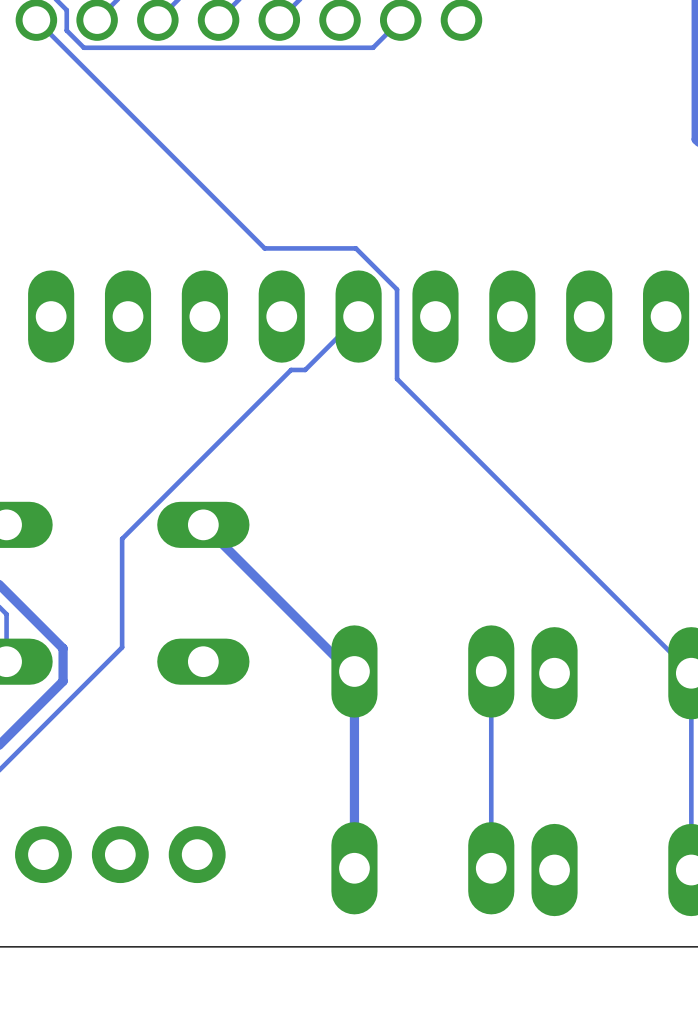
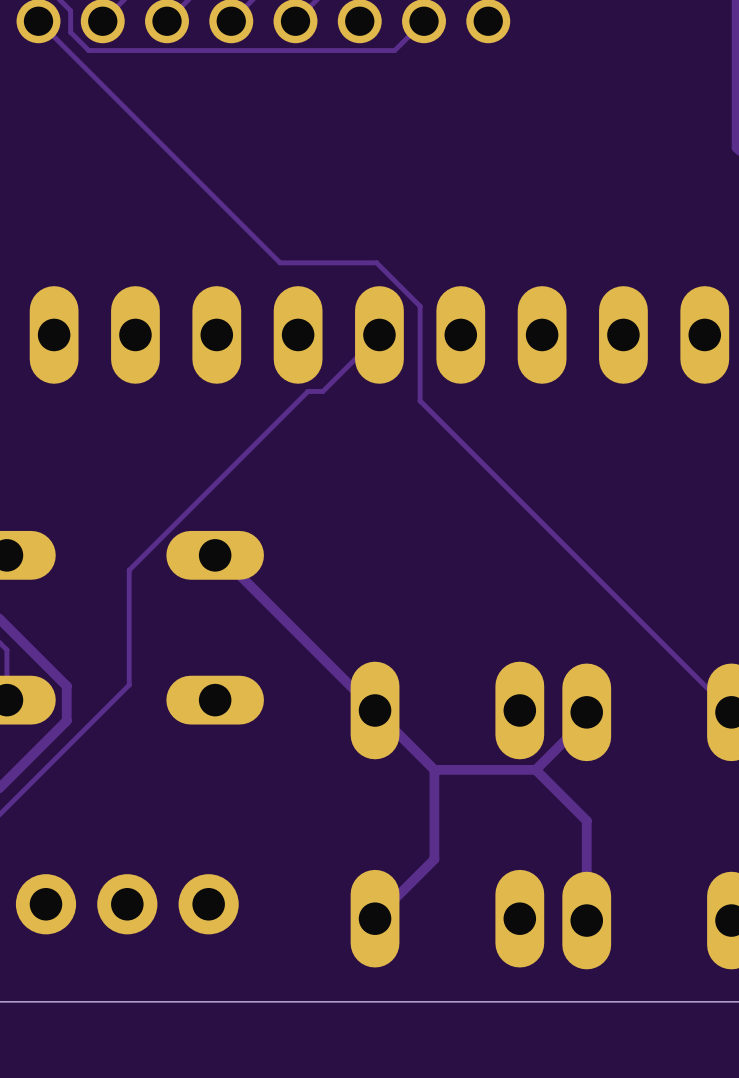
track: (203, 524) (349, 671) (354, 671) (354, 868) -> (215, 555) (219, 555) (434, 769)
track: (491, 671) (491, 868) -> none
track: none -> (586, 712) (586, 718) (535, 769)
track: (691, 673) (691, 870) -> none
track: none -> (434, 769) (434, 859) (375, 918)
track: none -> (535, 769) (434, 769)
track: none -> (535, 769) (586, 820) (586, 920)

